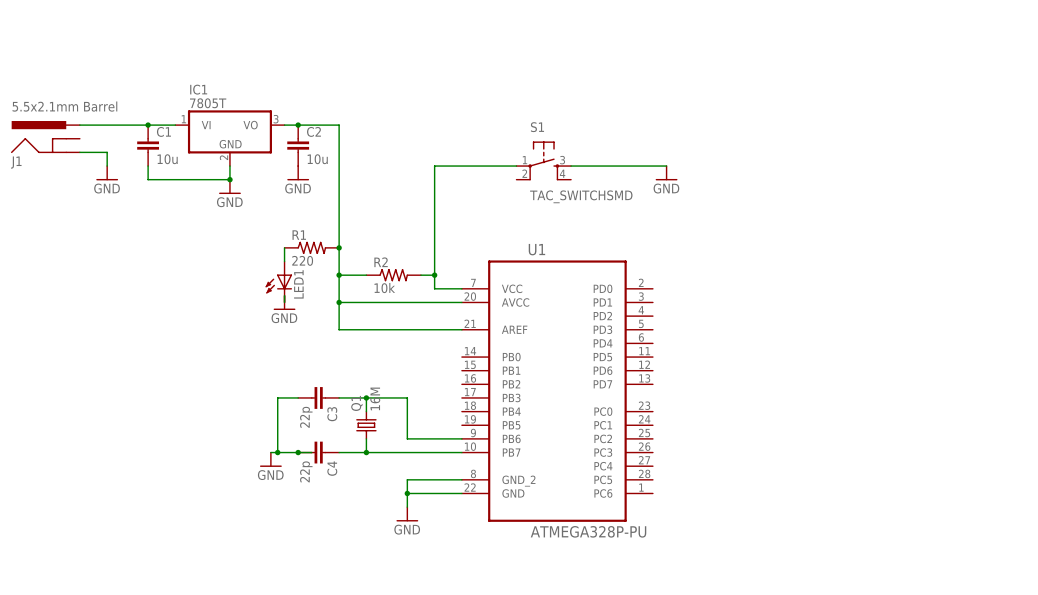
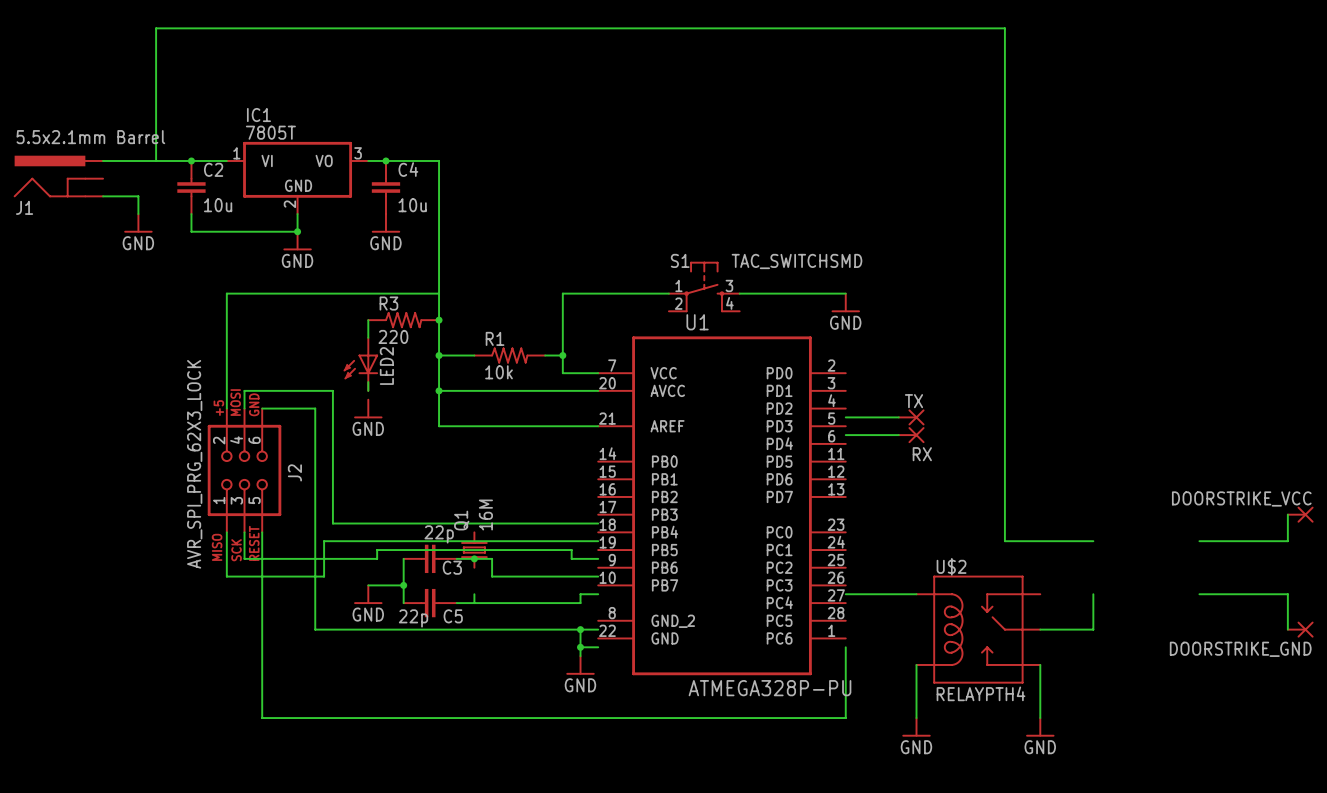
wire: none -> (156, 160) (156, 28) (1004, 28) (1004, 541) (1093, 541)
S1 name position: S1 (537, 127) -> S1 (680, 260)
C1 name: C1 (163, 131) -> C2 (213, 169)
C2 name: C2 (313, 131) -> C4 (408, 169)
S1 position: (543, 160) -> (704, 286)
wire: (516, 166) (434, 166) (434, 227) -> (668, 293) (562, 293)
wire: (571, 166) (666, 166) -> none
power symbol position: GND (666, 173) -> GND (845, 302)
S1 value position: TAC_SWITCHSMD (581, 196) -> TAC_SWITCHSMD (796, 261)
wire: none -> (439, 293) (226, 293) (226, 408)
wire: none -> (739, 293) (845, 293)
R1 name: R1 (299, 235) -> R3 (388, 303)
R2 name: R2 (381, 262) -> R1 (495, 338)
LED1 name: LED1 (298, 284) -> LED2 (386, 366)
power symbol position: GND (284, 302) -> GND (368, 409)
wire: none -> (244, 408) (244, 390) (332, 390) (332, 523) (598, 523)
wire: none -> (262, 408) (315, 408) (315, 629) (598, 629)
wire: none -> (845, 417) (898, 417)
TX: none -> (911, 417)
wire: none -> (845, 435) (898, 435)
RX: none -> (911, 435)
J2: none -> AVR_SPI_PRG_62X3_LOCK (244, 470)
wire: (298, 397) (277, 397) (277, 452) -> none
C3 position: (318, 397) -> (430, 558)
wire: (339, 397) (407, 397) (407, 438) (461, 438) -> none
wire: (366, 397) (366, 411) -> none
junction: (366, 397) -> none
wire: none -> (1287, 514) (1287, 541) (1199, 541)
DOORSTRIKE_VCC: none -> (1300, 514)
wire: none -> (226, 532) (226, 576) (324, 576) (324, 541) (598, 541)
wire: none -> (244, 532) (244, 558) (377, 558) (377, 550) (571, 550) (571, 558) (598, 558)
wire: none -> (262, 532) (262, 718) (845, 718) (845, 647)
C3 name rotation: 0° (332, 414) -> 90° clockwise (452, 567)
C3 value rotation: 0° (306, 417) -> 90° clockwise (439, 534)
C3 value position: 22p (306, 417) -> 22p (439, 534)
wire: none -> (403, 558) (403, 603)
wire: none -> (456, 558) (492, 558) (492, 576) (598, 576)
junction: none -> (474, 558)
wire: (366, 438) (366, 452) -> none
wire: (270, 452) (284, 452) -> none
junction: (277, 452) -> none
junction position: (298, 452) -> (403, 585)
C4: 22p (318, 452) -> none
wire: (339, 452) (461, 452) -> none
junction: (366, 452) -> none
power symbol position: GND (270, 459) -> GND (368, 594)
wire: none -> (474, 594) (474, 603)
wire: none -> (598, 594) (580, 594) (580, 603) (456, 603)
wire: none -> (845, 594) (916, 594)
wire: none -> (1093, 594) (1093, 629) (1040, 629)
wire: none -> (1199, 594) (1287, 594) (1287, 629)
C5: none -> 22p (430, 603)
wire: (461, 479) (407, 479) (407, 507) -> none
wire: none -> (580, 629) (580, 656)
junction: none -> (580, 629)
U$2: none -> RELAYPTH4 (978, 629)
DOORSTRIKE_GND: none -> (1300, 629)
wire: (407, 493) (461, 493) -> none
junction: (407, 493) -> none
wire: none -> (580, 647) (598, 647)
junction: none -> (580, 647)
wire: none -> (916, 664) (916, 718)
wire: none -> (1040, 664) (1040, 718)
power symbol position: GND (407, 514) -> GND (580, 665)
power symbol: none -> GND (916, 727)
power symbol: none -> GND (1040, 727)

